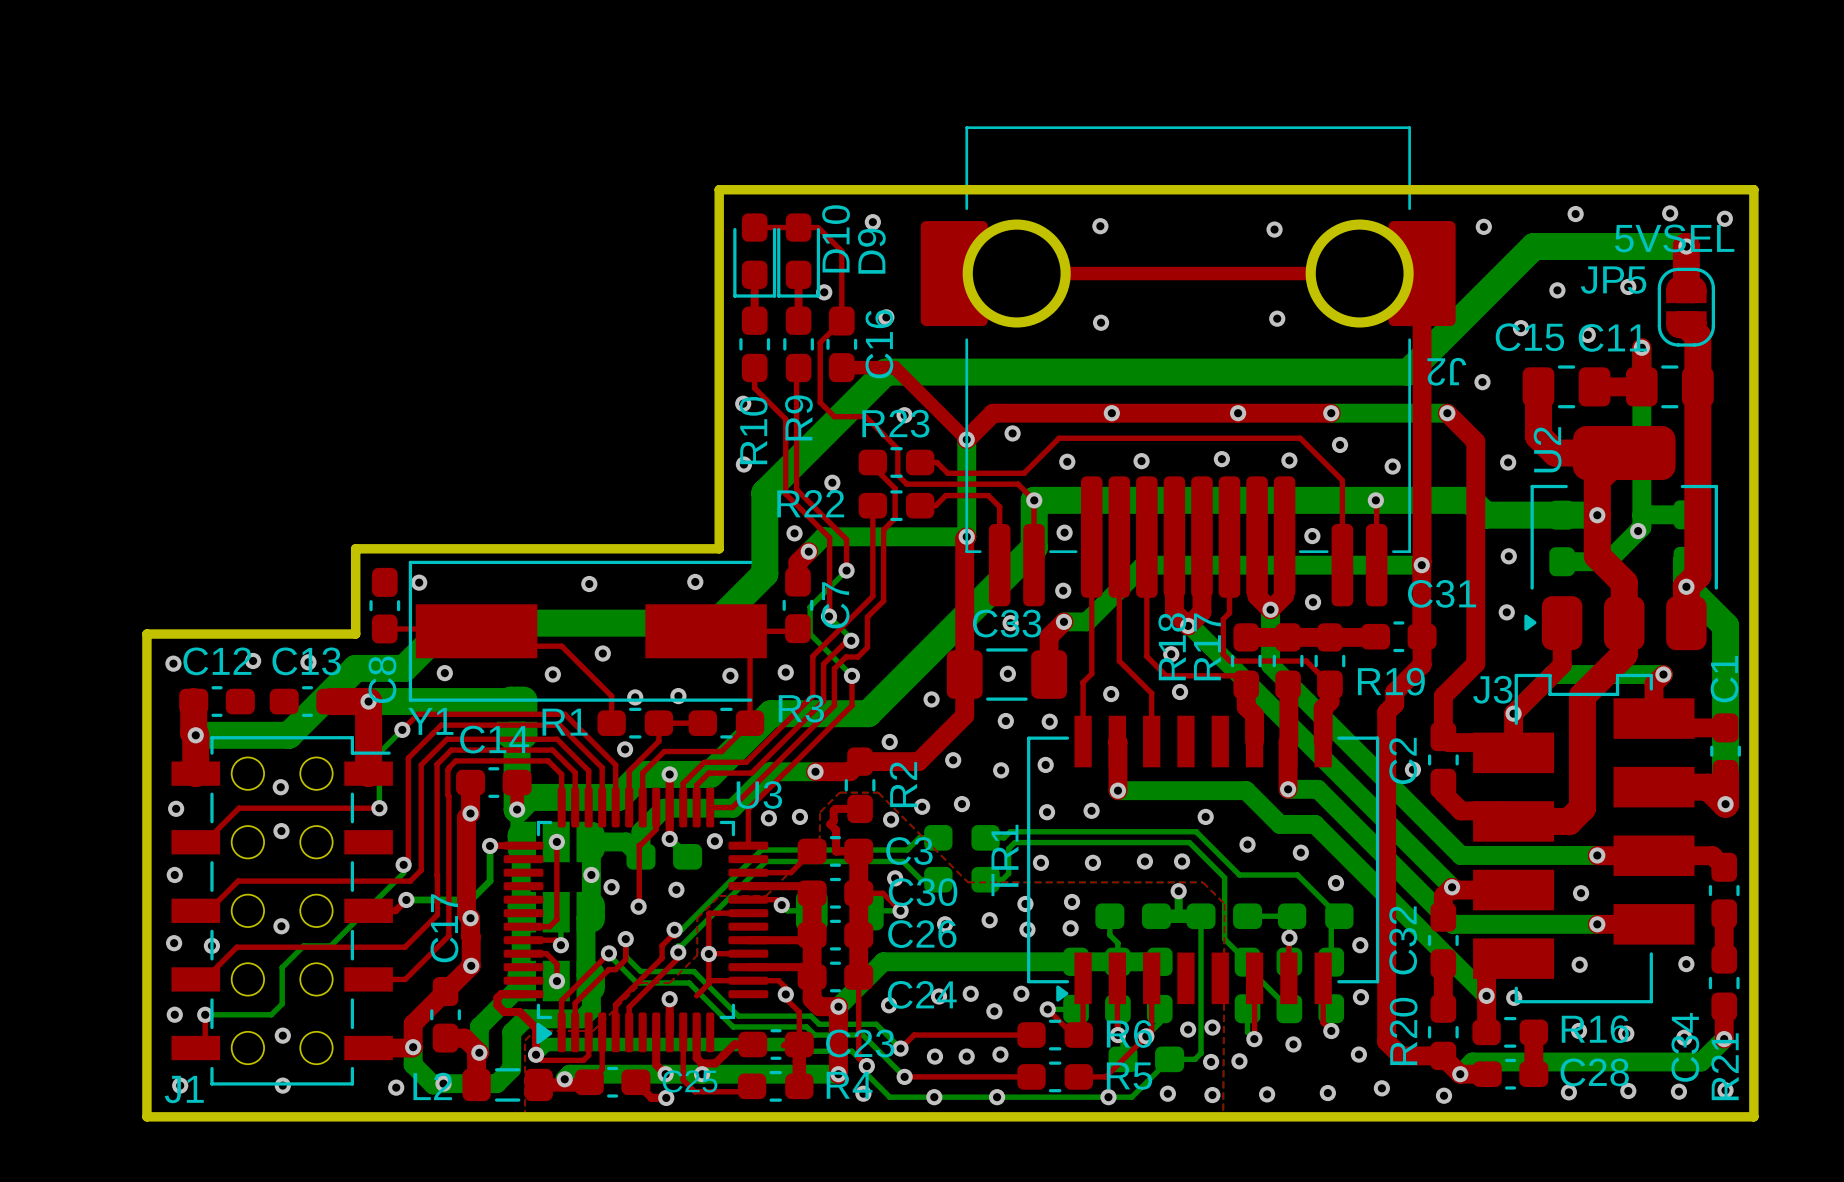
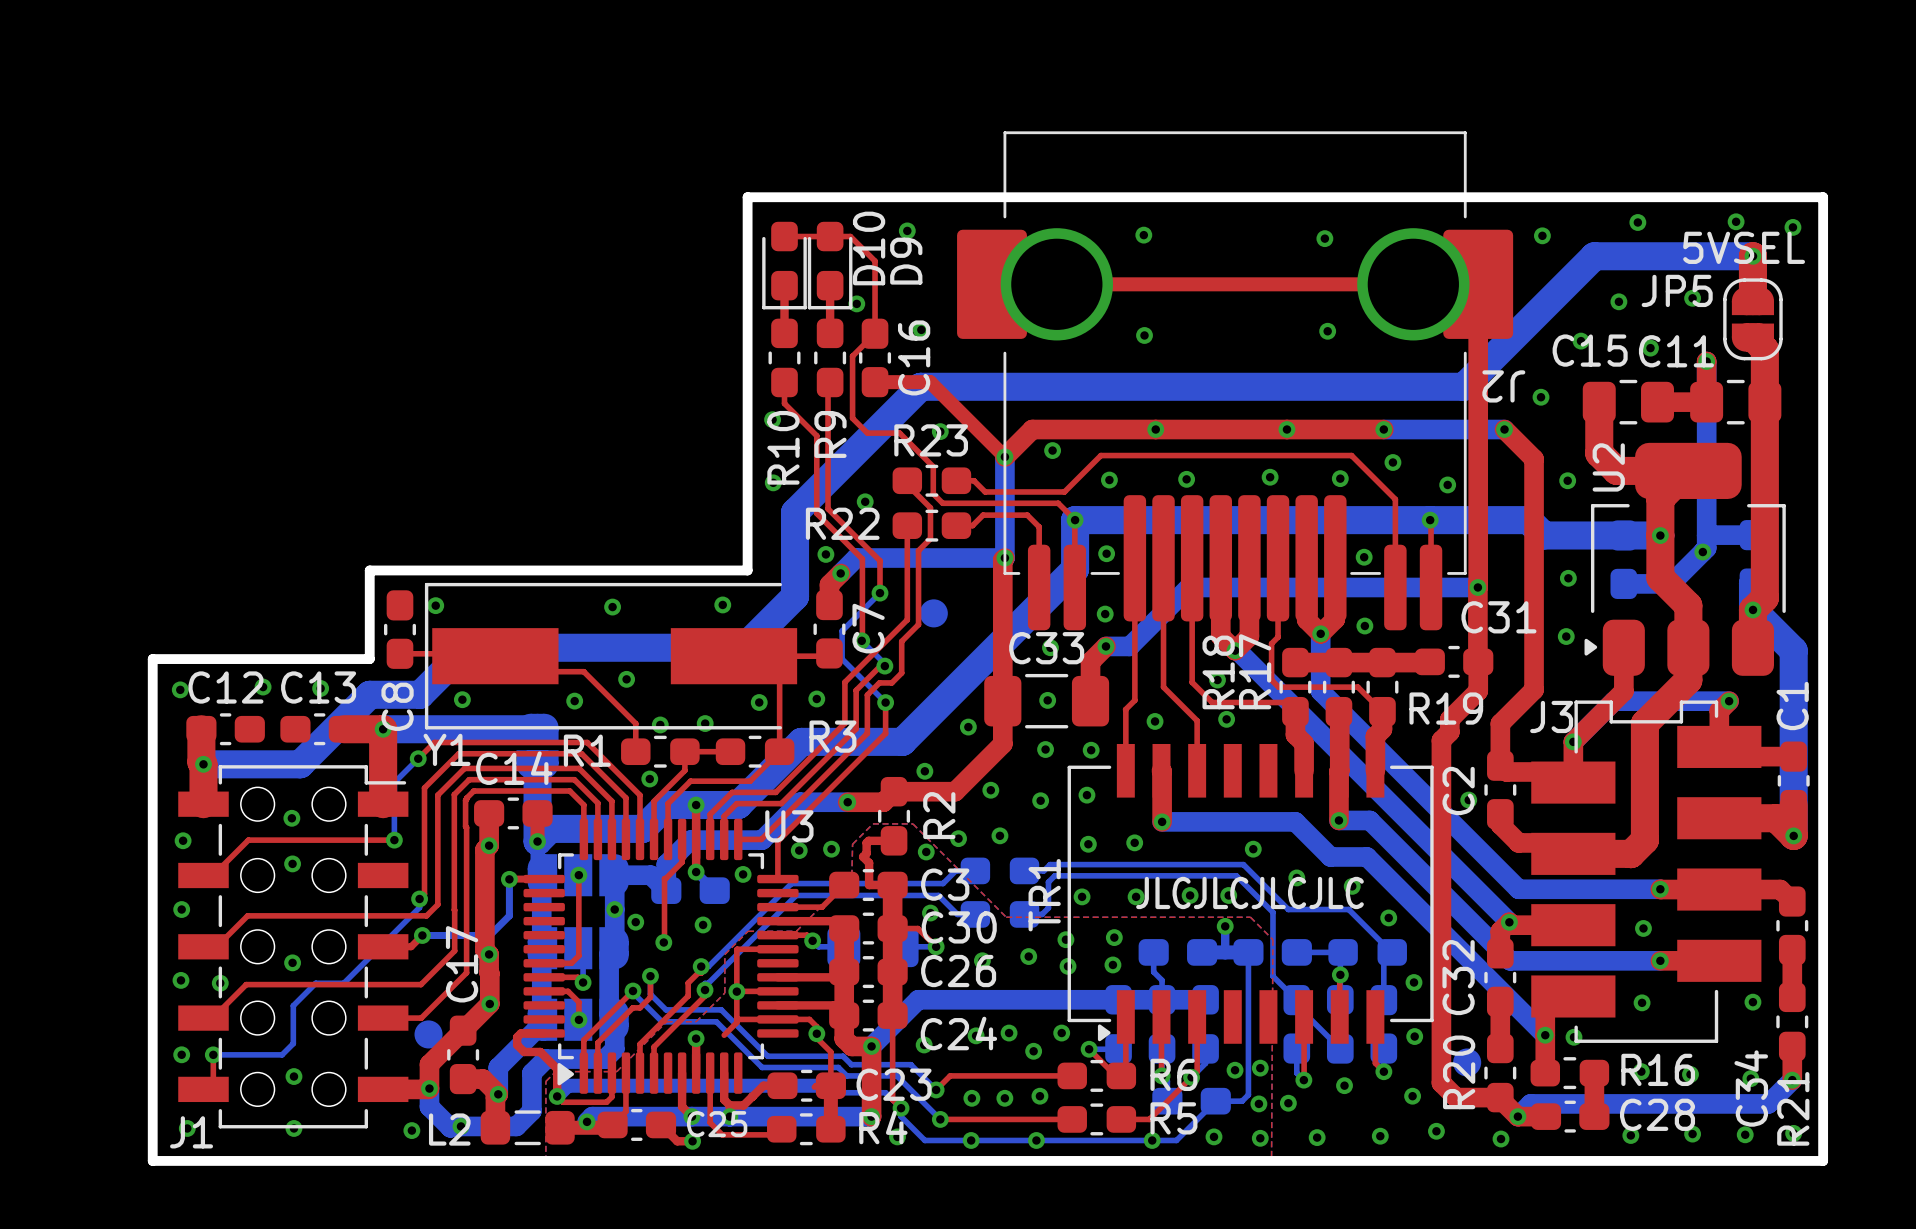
part: none -> (933, 613)
text: none -> JLCJLCJLCJLC (1250, 892)
part: none -> (428, 1034)
part: none -> (1467, 1062)

